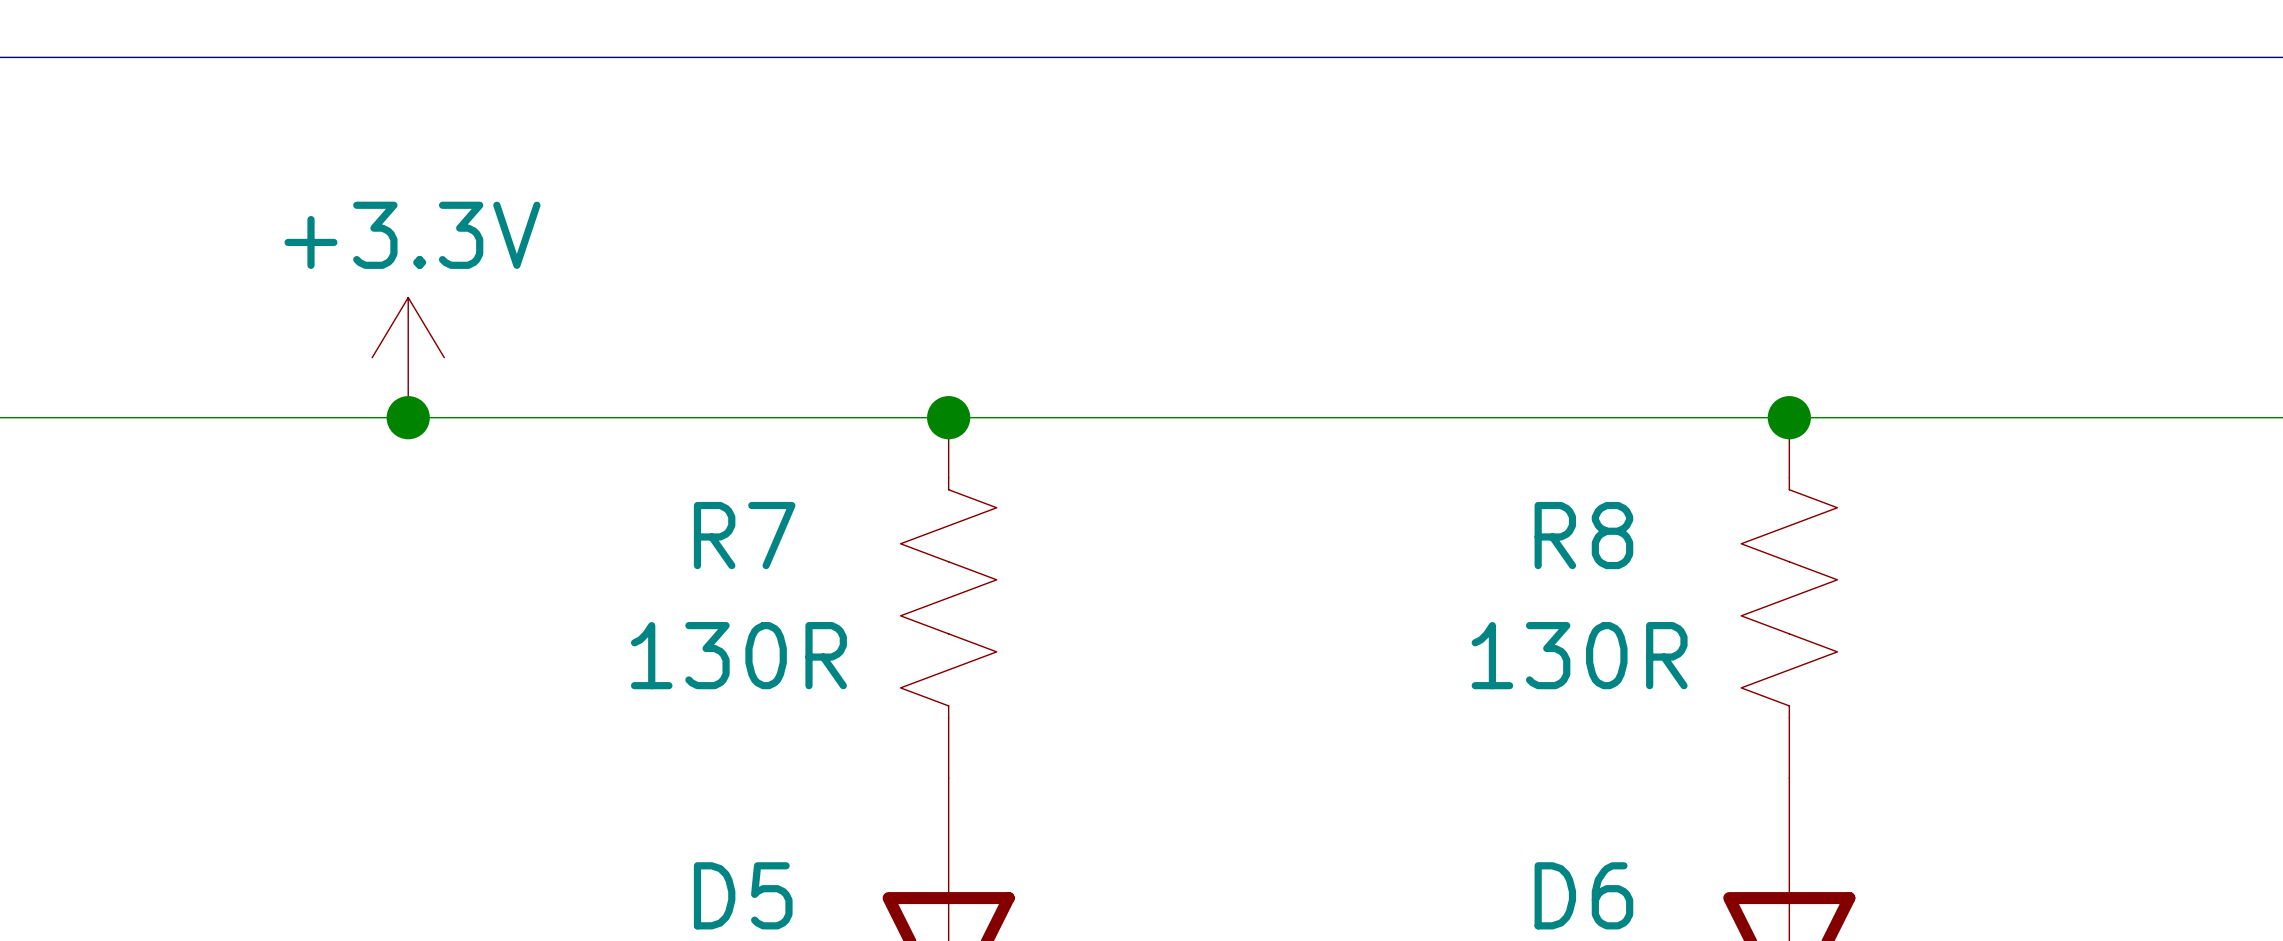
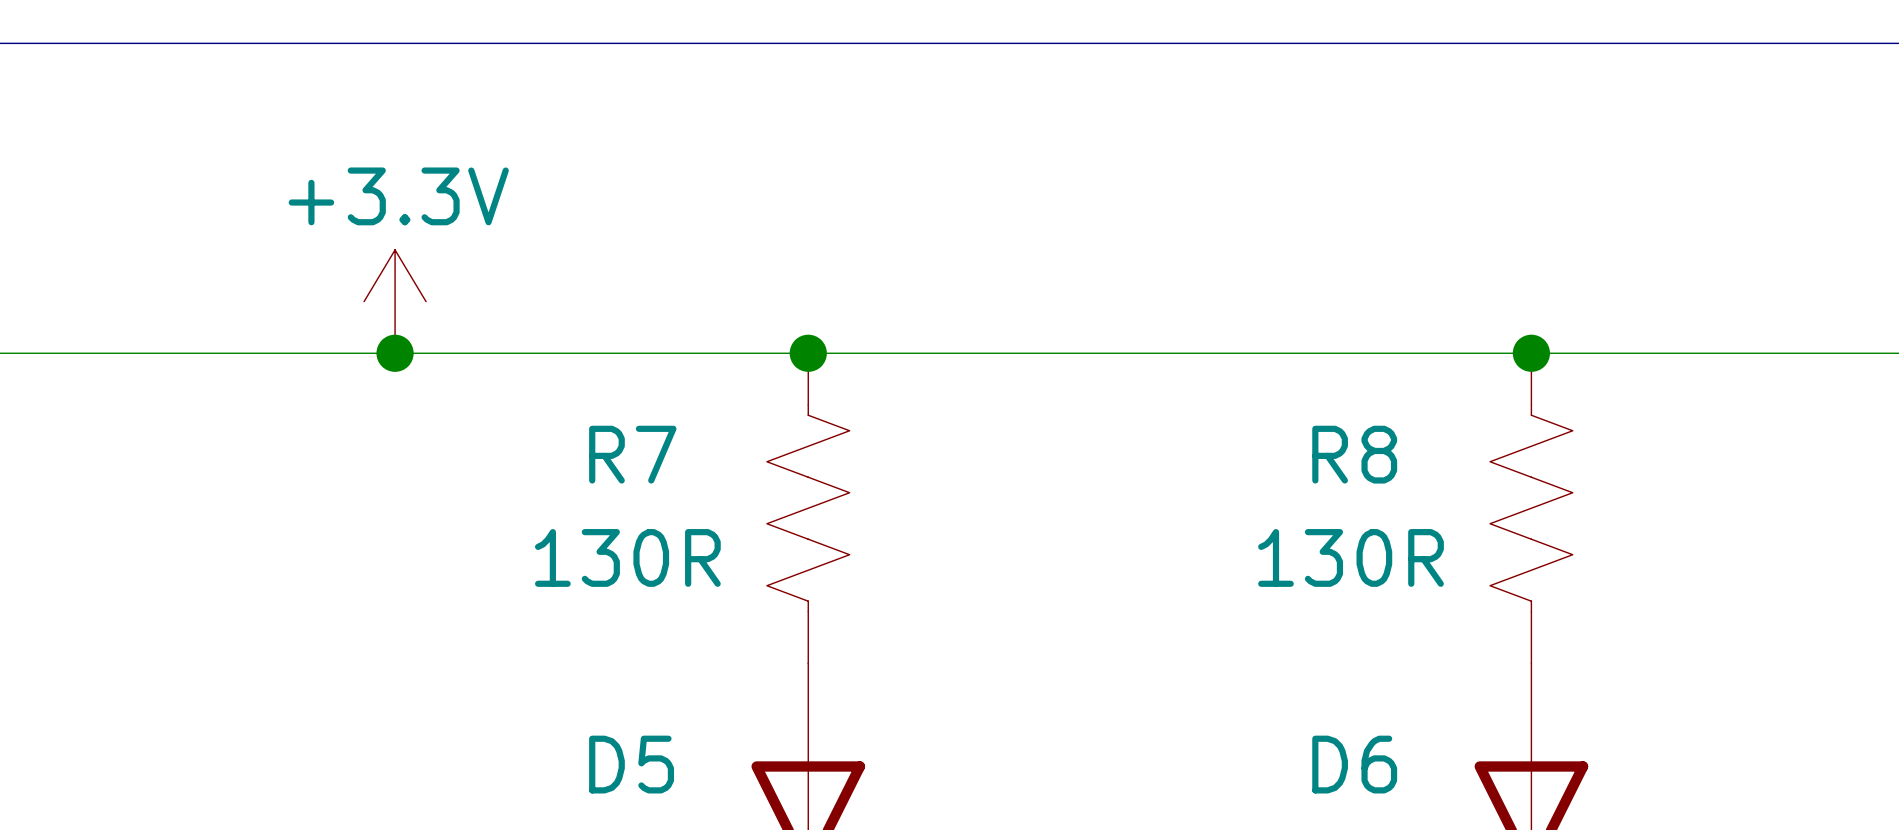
power symbol position: +3.3V (408, 357) -> +3.3V (395, 301)
junction position: (408, 417) -> (395, 353)

